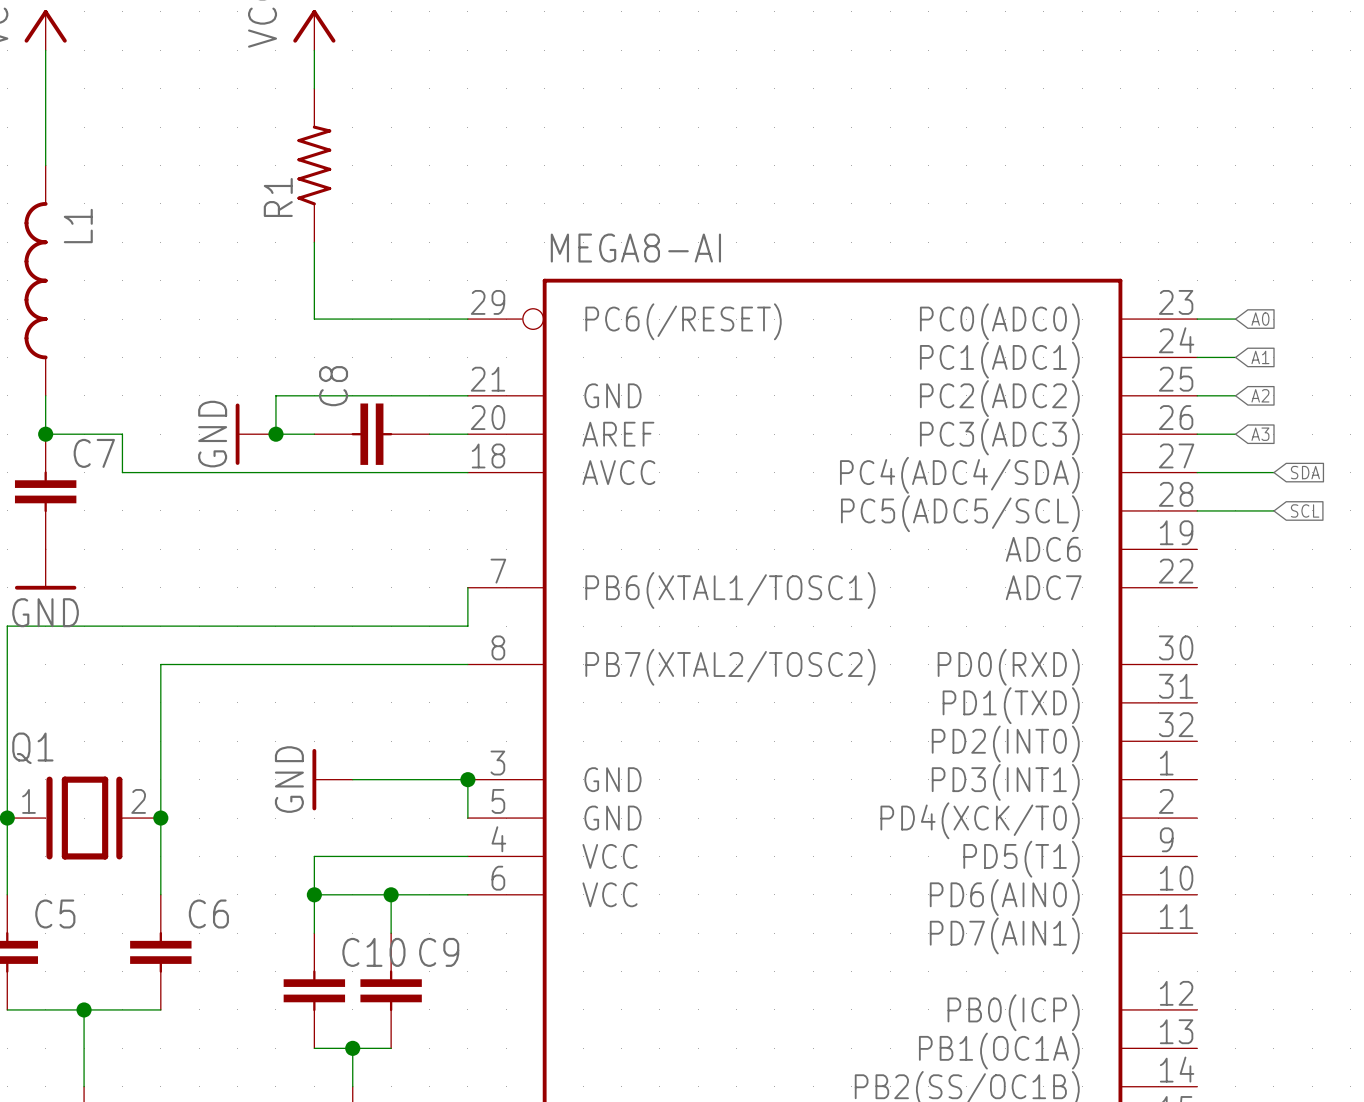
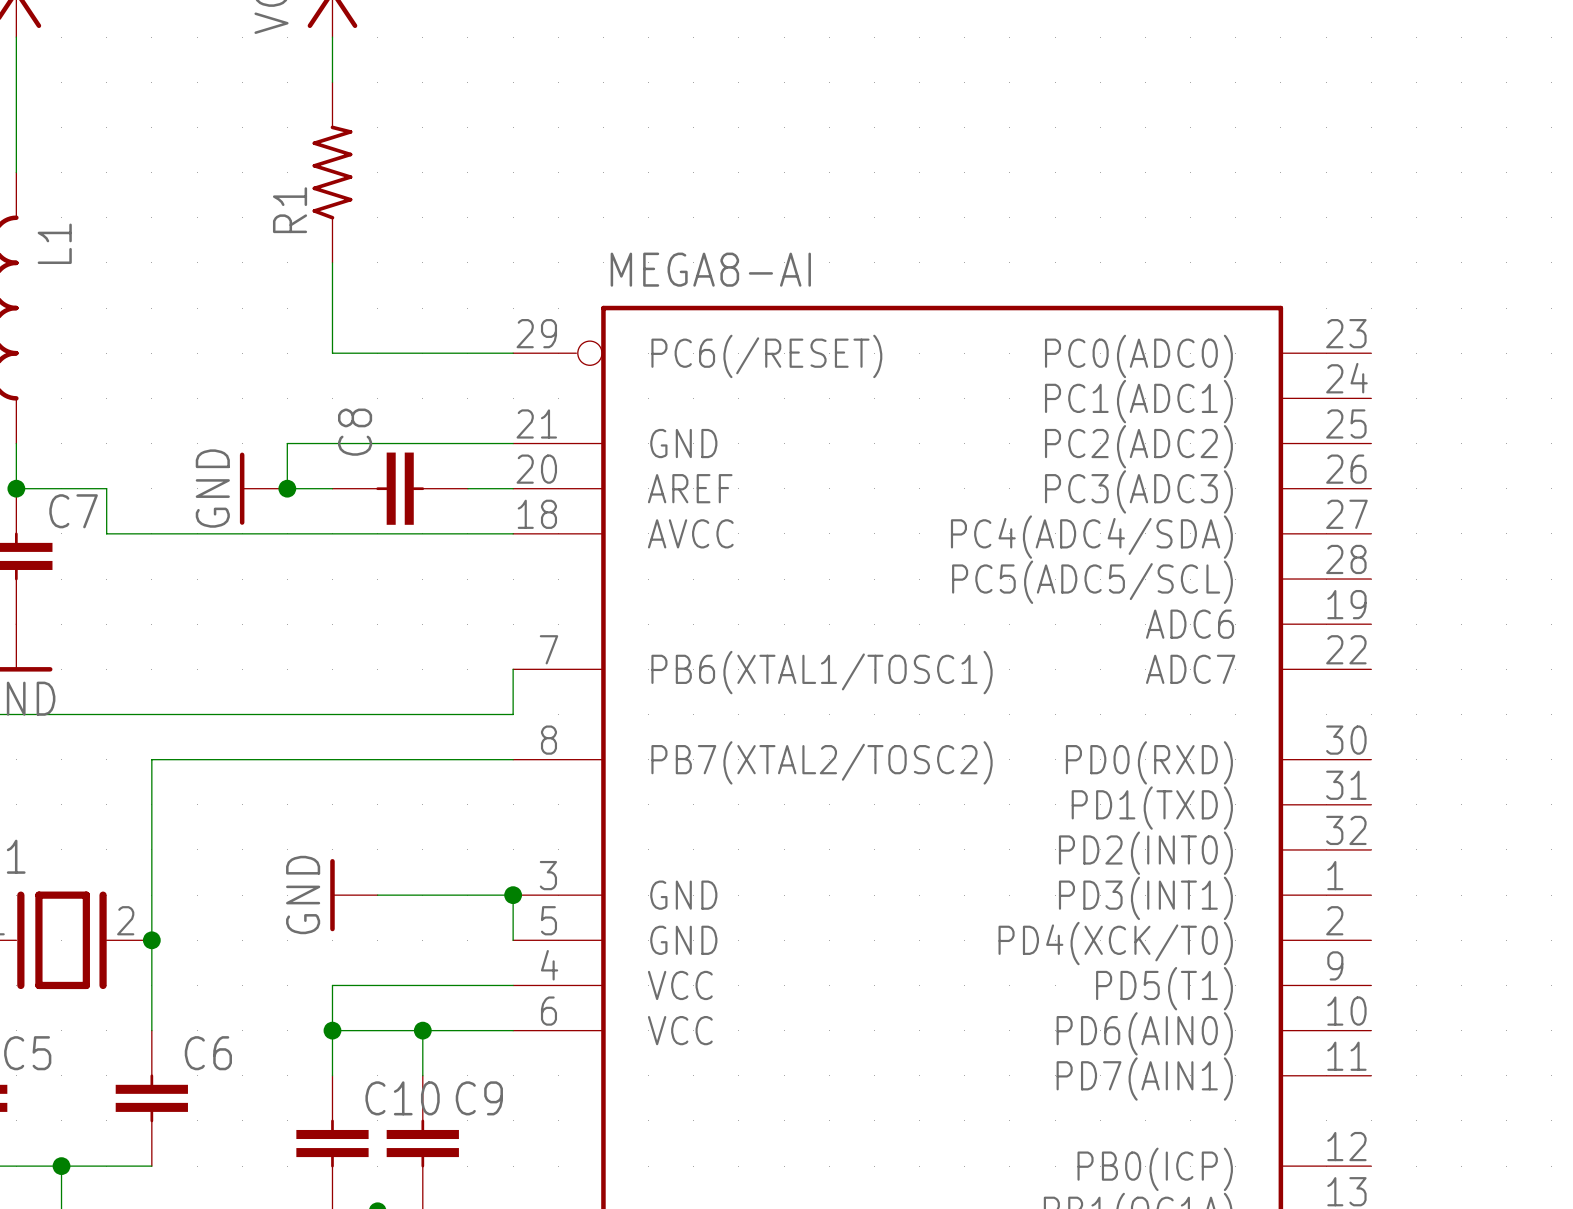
wire: (1197, 319) (1235, 319) -> none
global label: A0 (1260, 319) -> none
wire: (1197, 357) (1235, 357) -> none
global label: A1 (1260, 357) -> none
wire: (1197, 395) (1235, 395) -> none
global label: A2 (1260, 395) -> none
wire: (1197, 434) (1235, 434) -> none
global label: A3 (1260, 434) -> none
wire: (1197, 472) (1273, 472) -> none
global label: SDA (1305, 472) -> none
wire: (1197, 510) (1273, 510) -> none
global label: SCL (1305, 510) -> none

